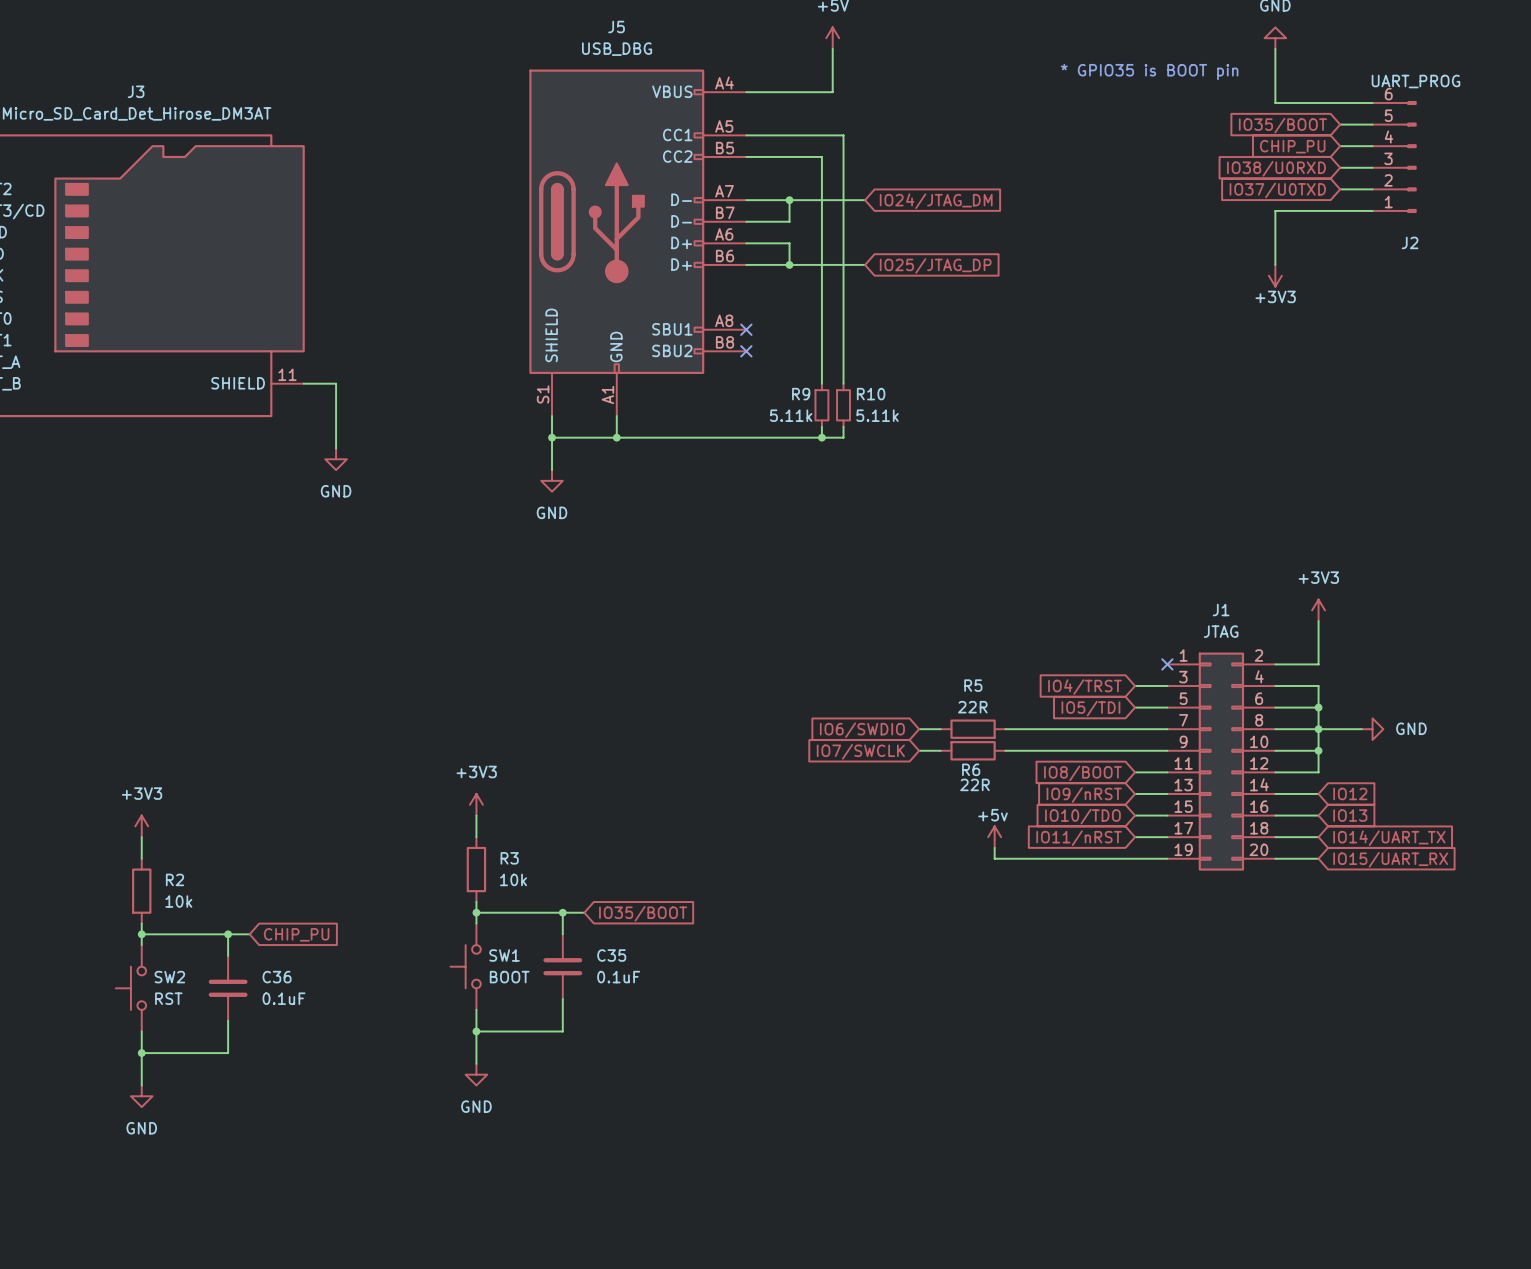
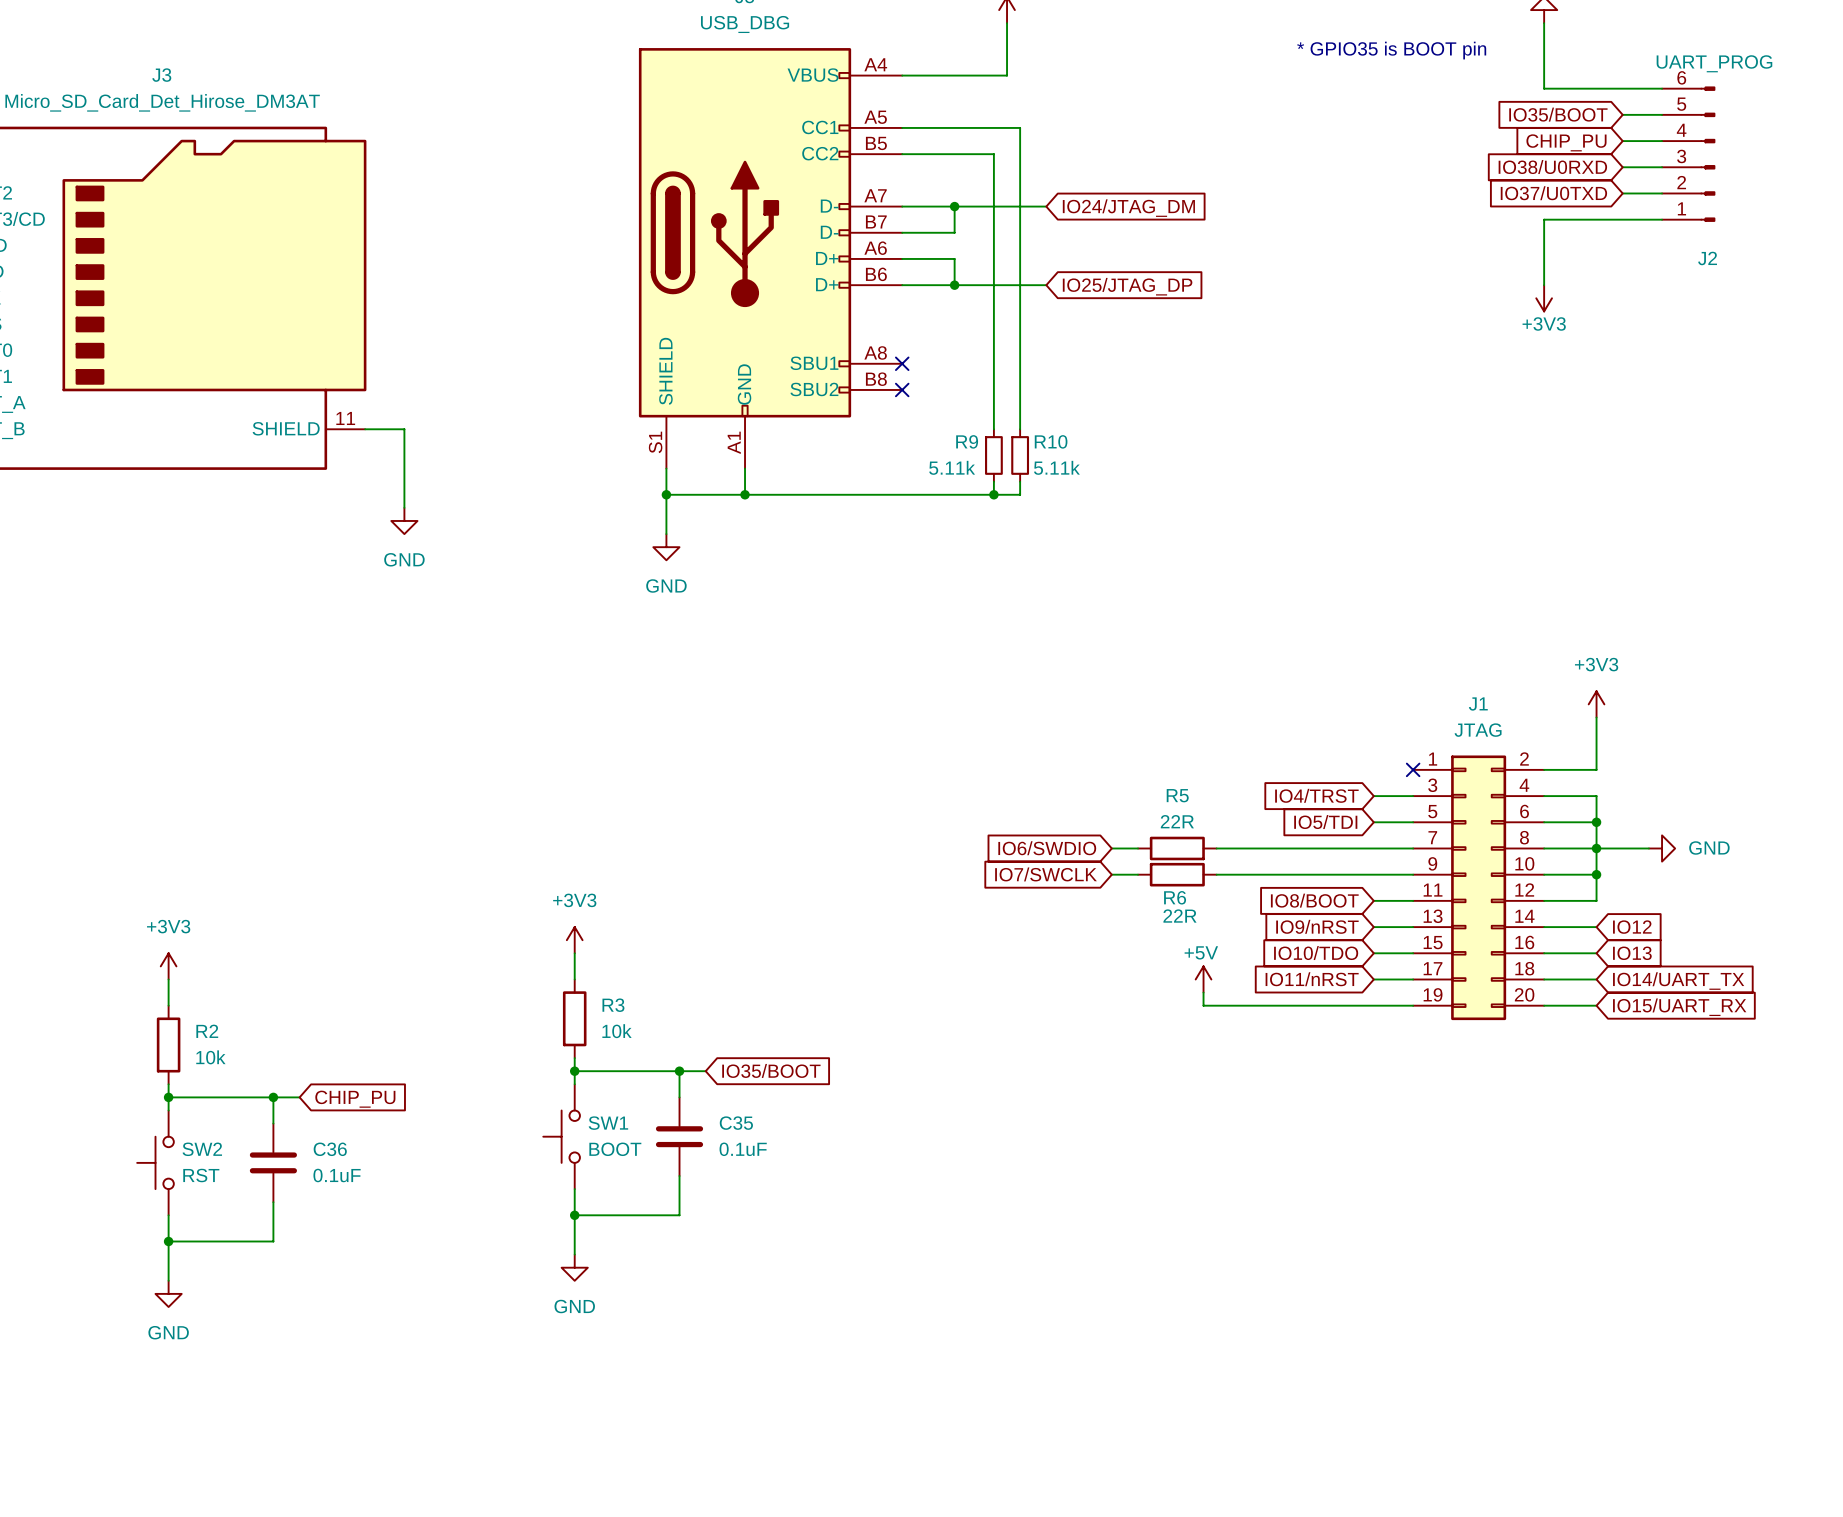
power symbol: +5v (994, 837) -> +5V (1203, 979)

